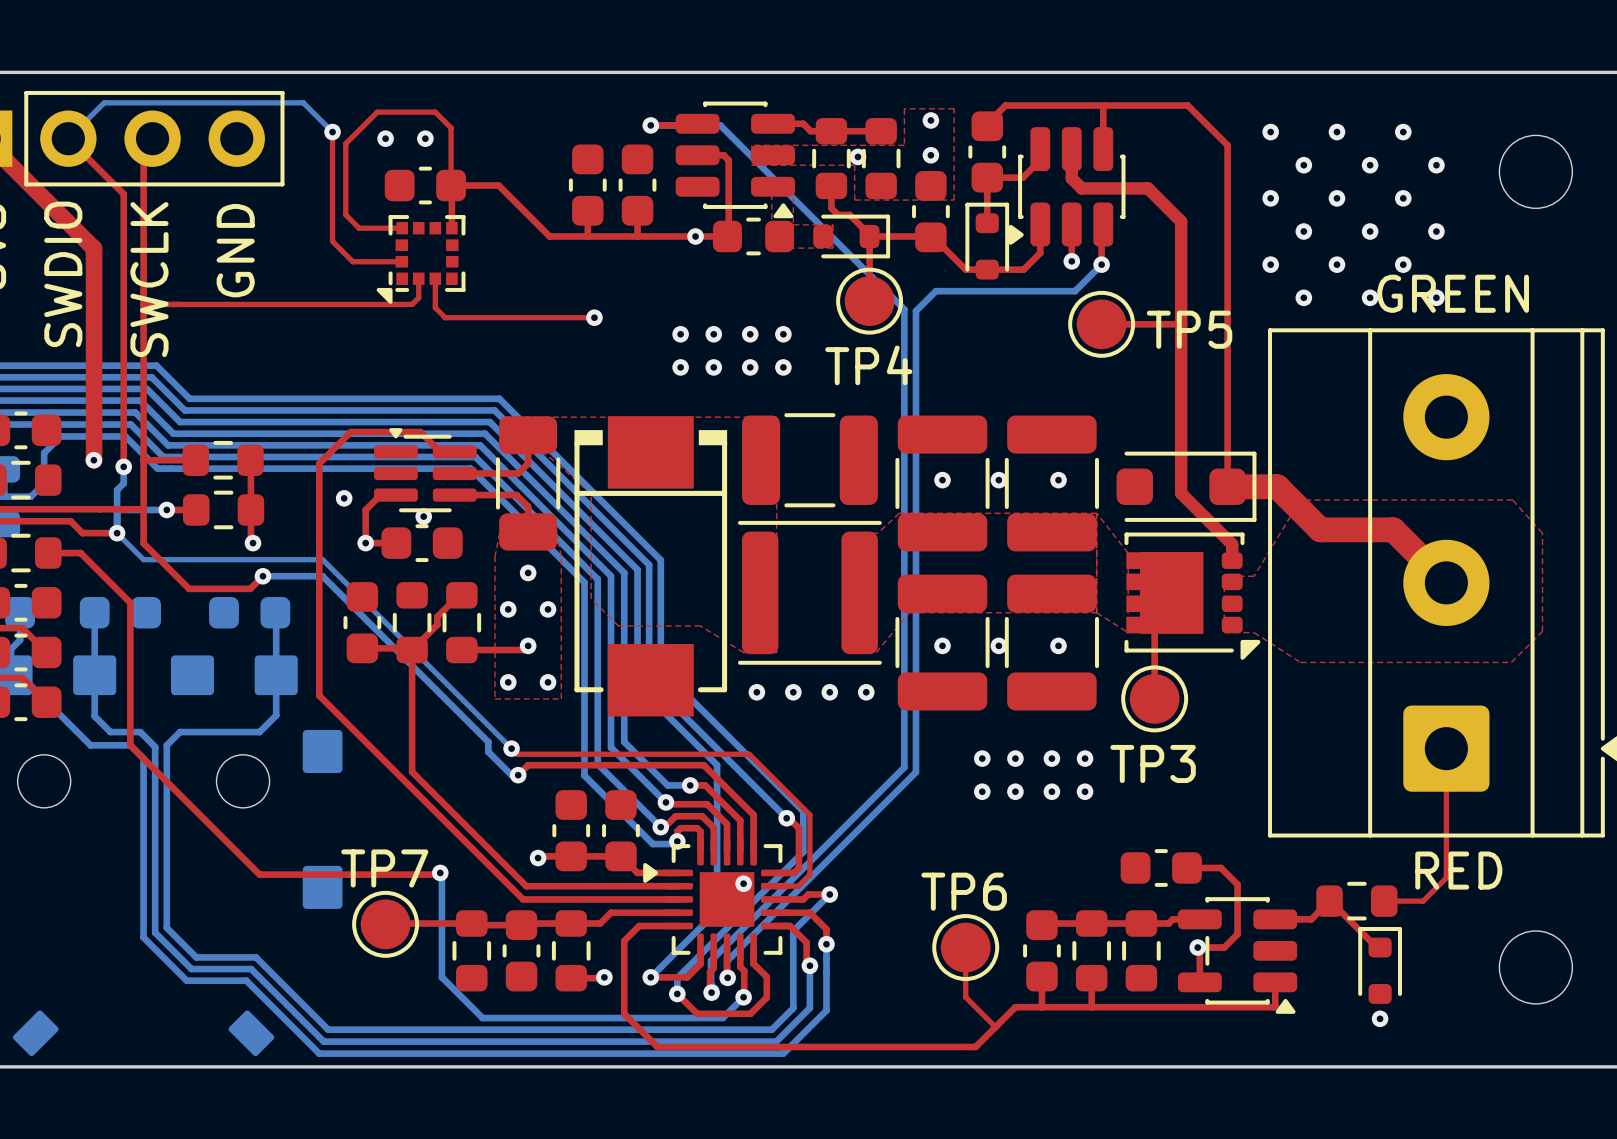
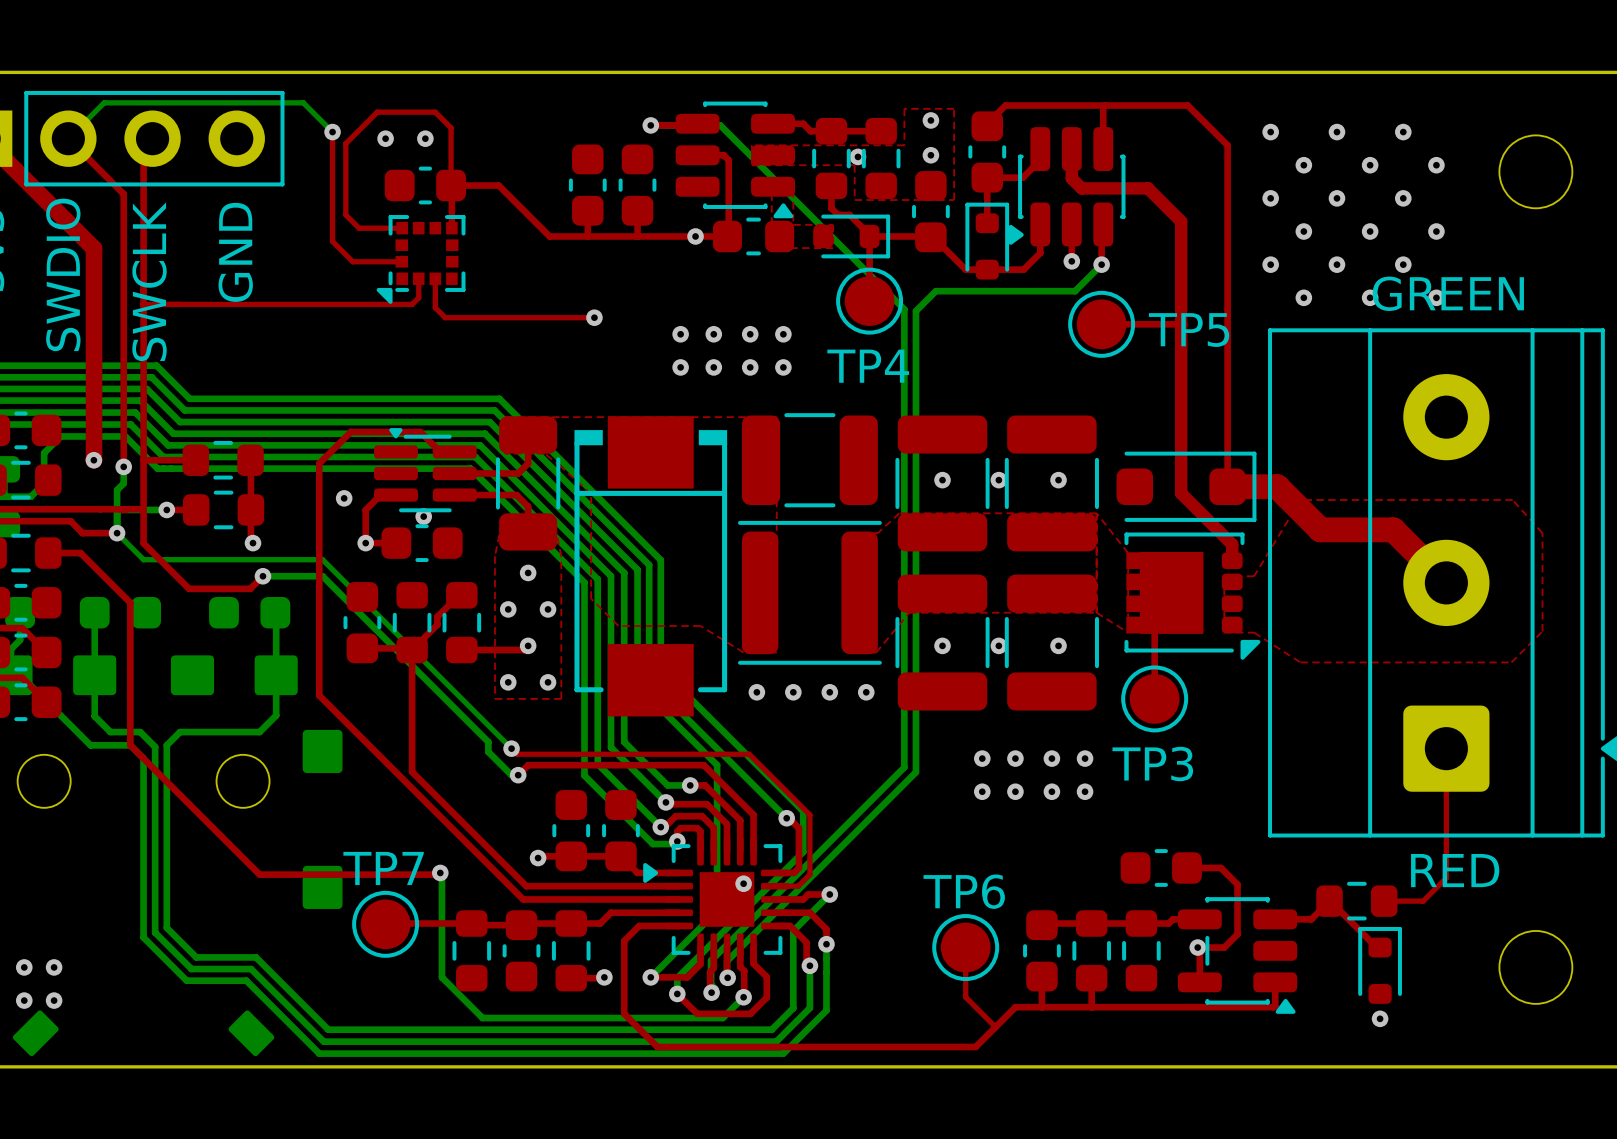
via: none -> (24, 967)
via: none -> (54, 967)
via: none -> (24, 1000)
via: none -> (54, 1000)

